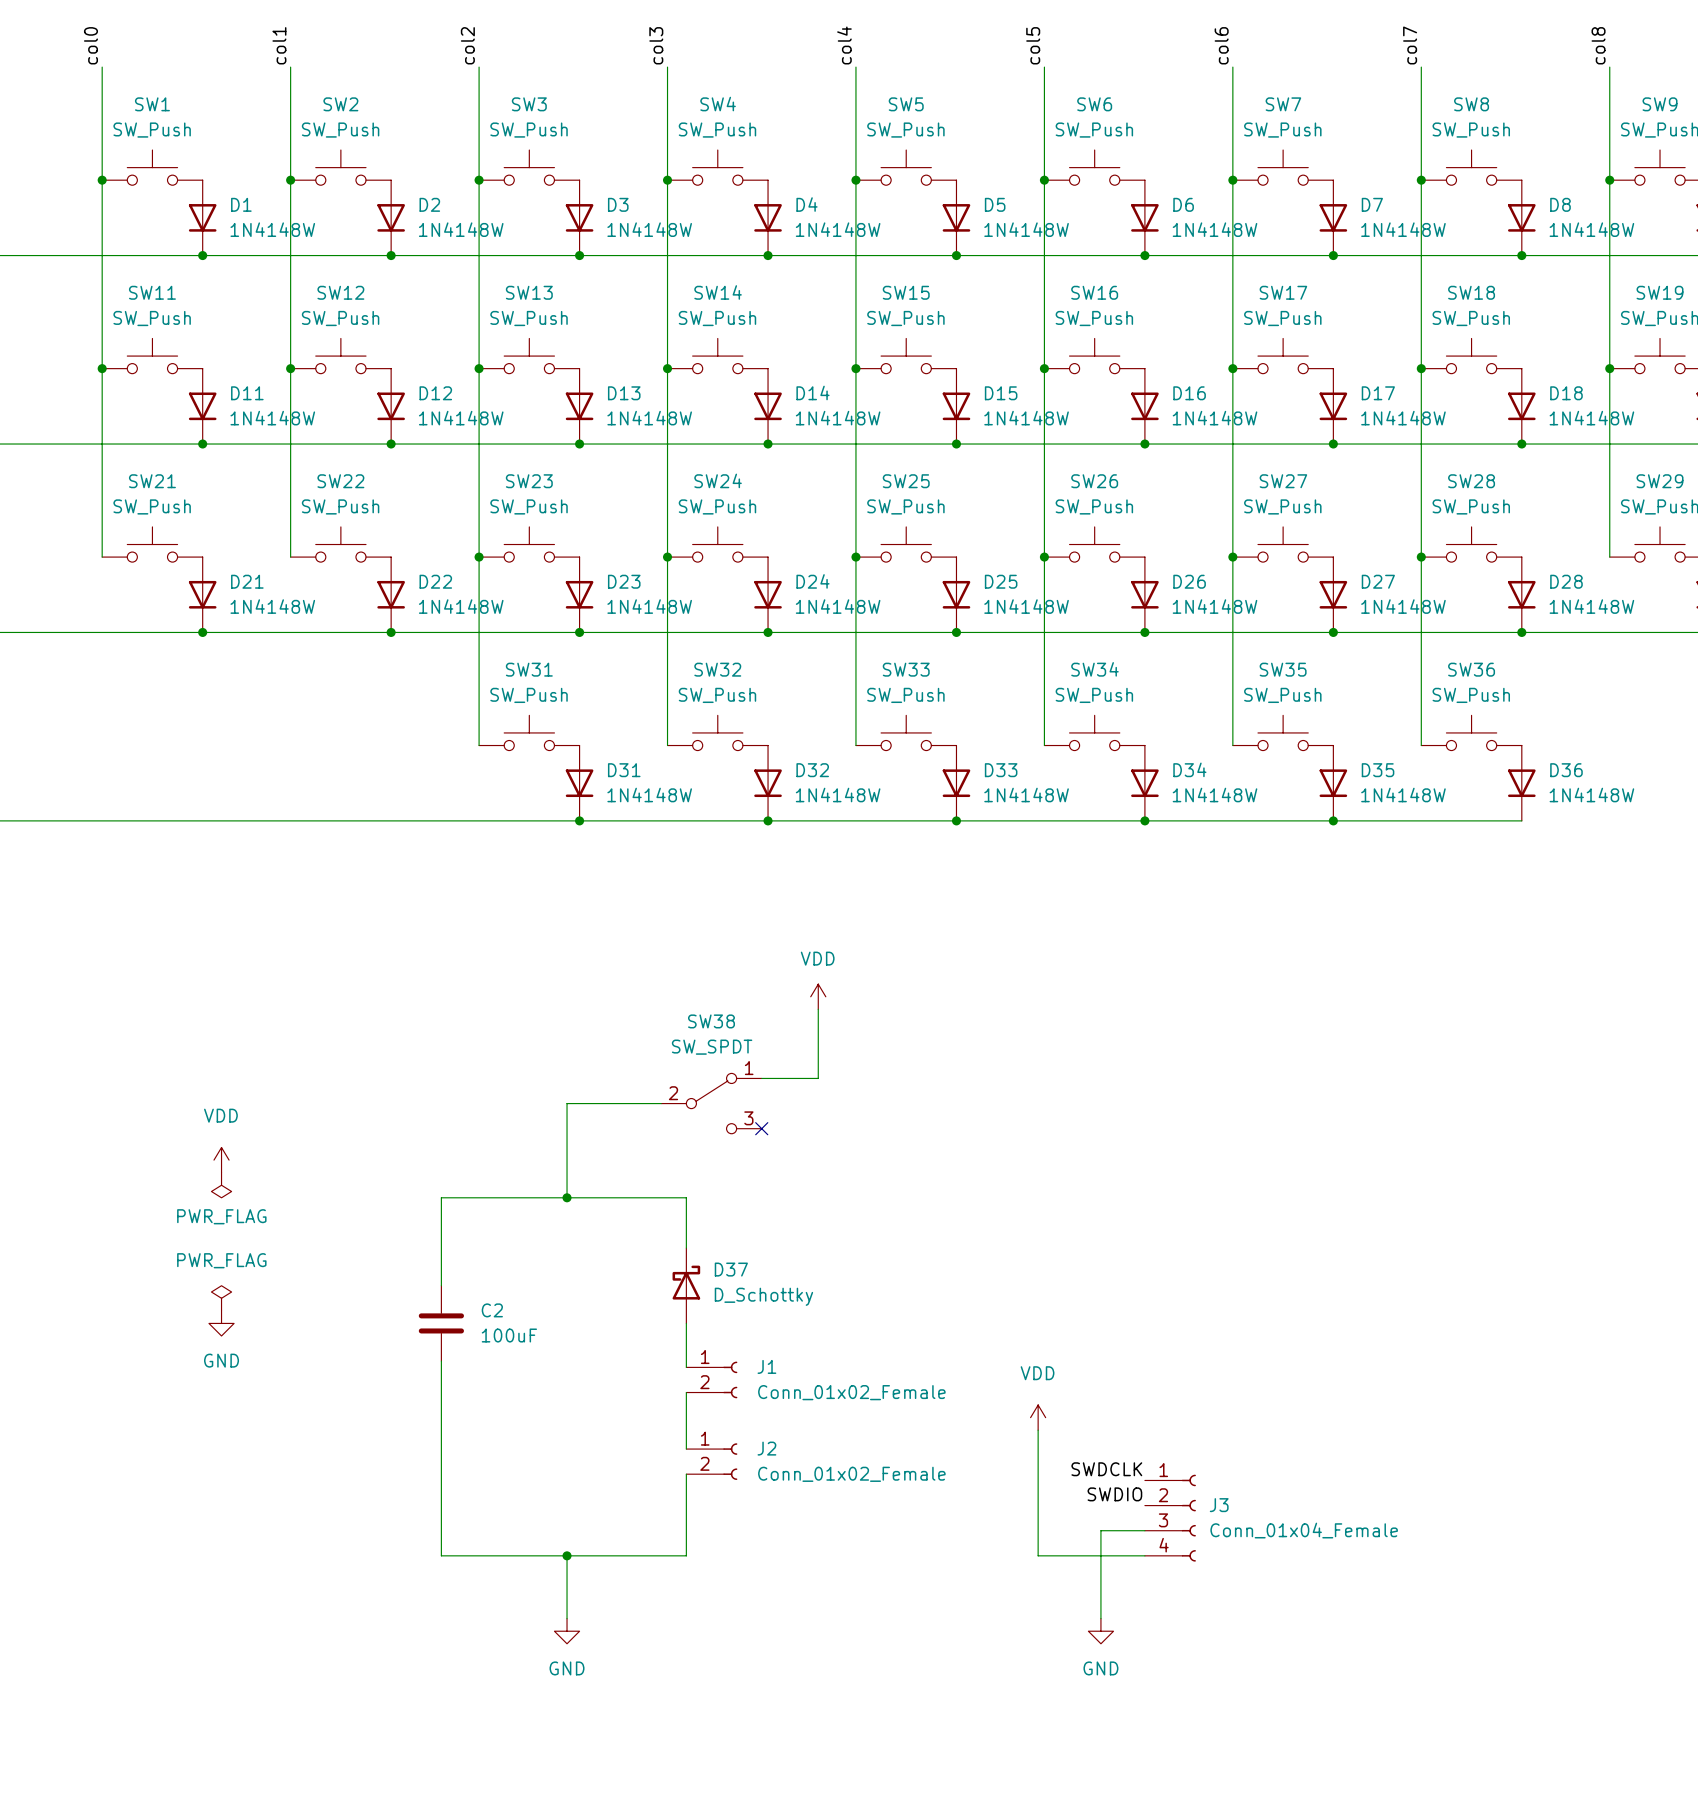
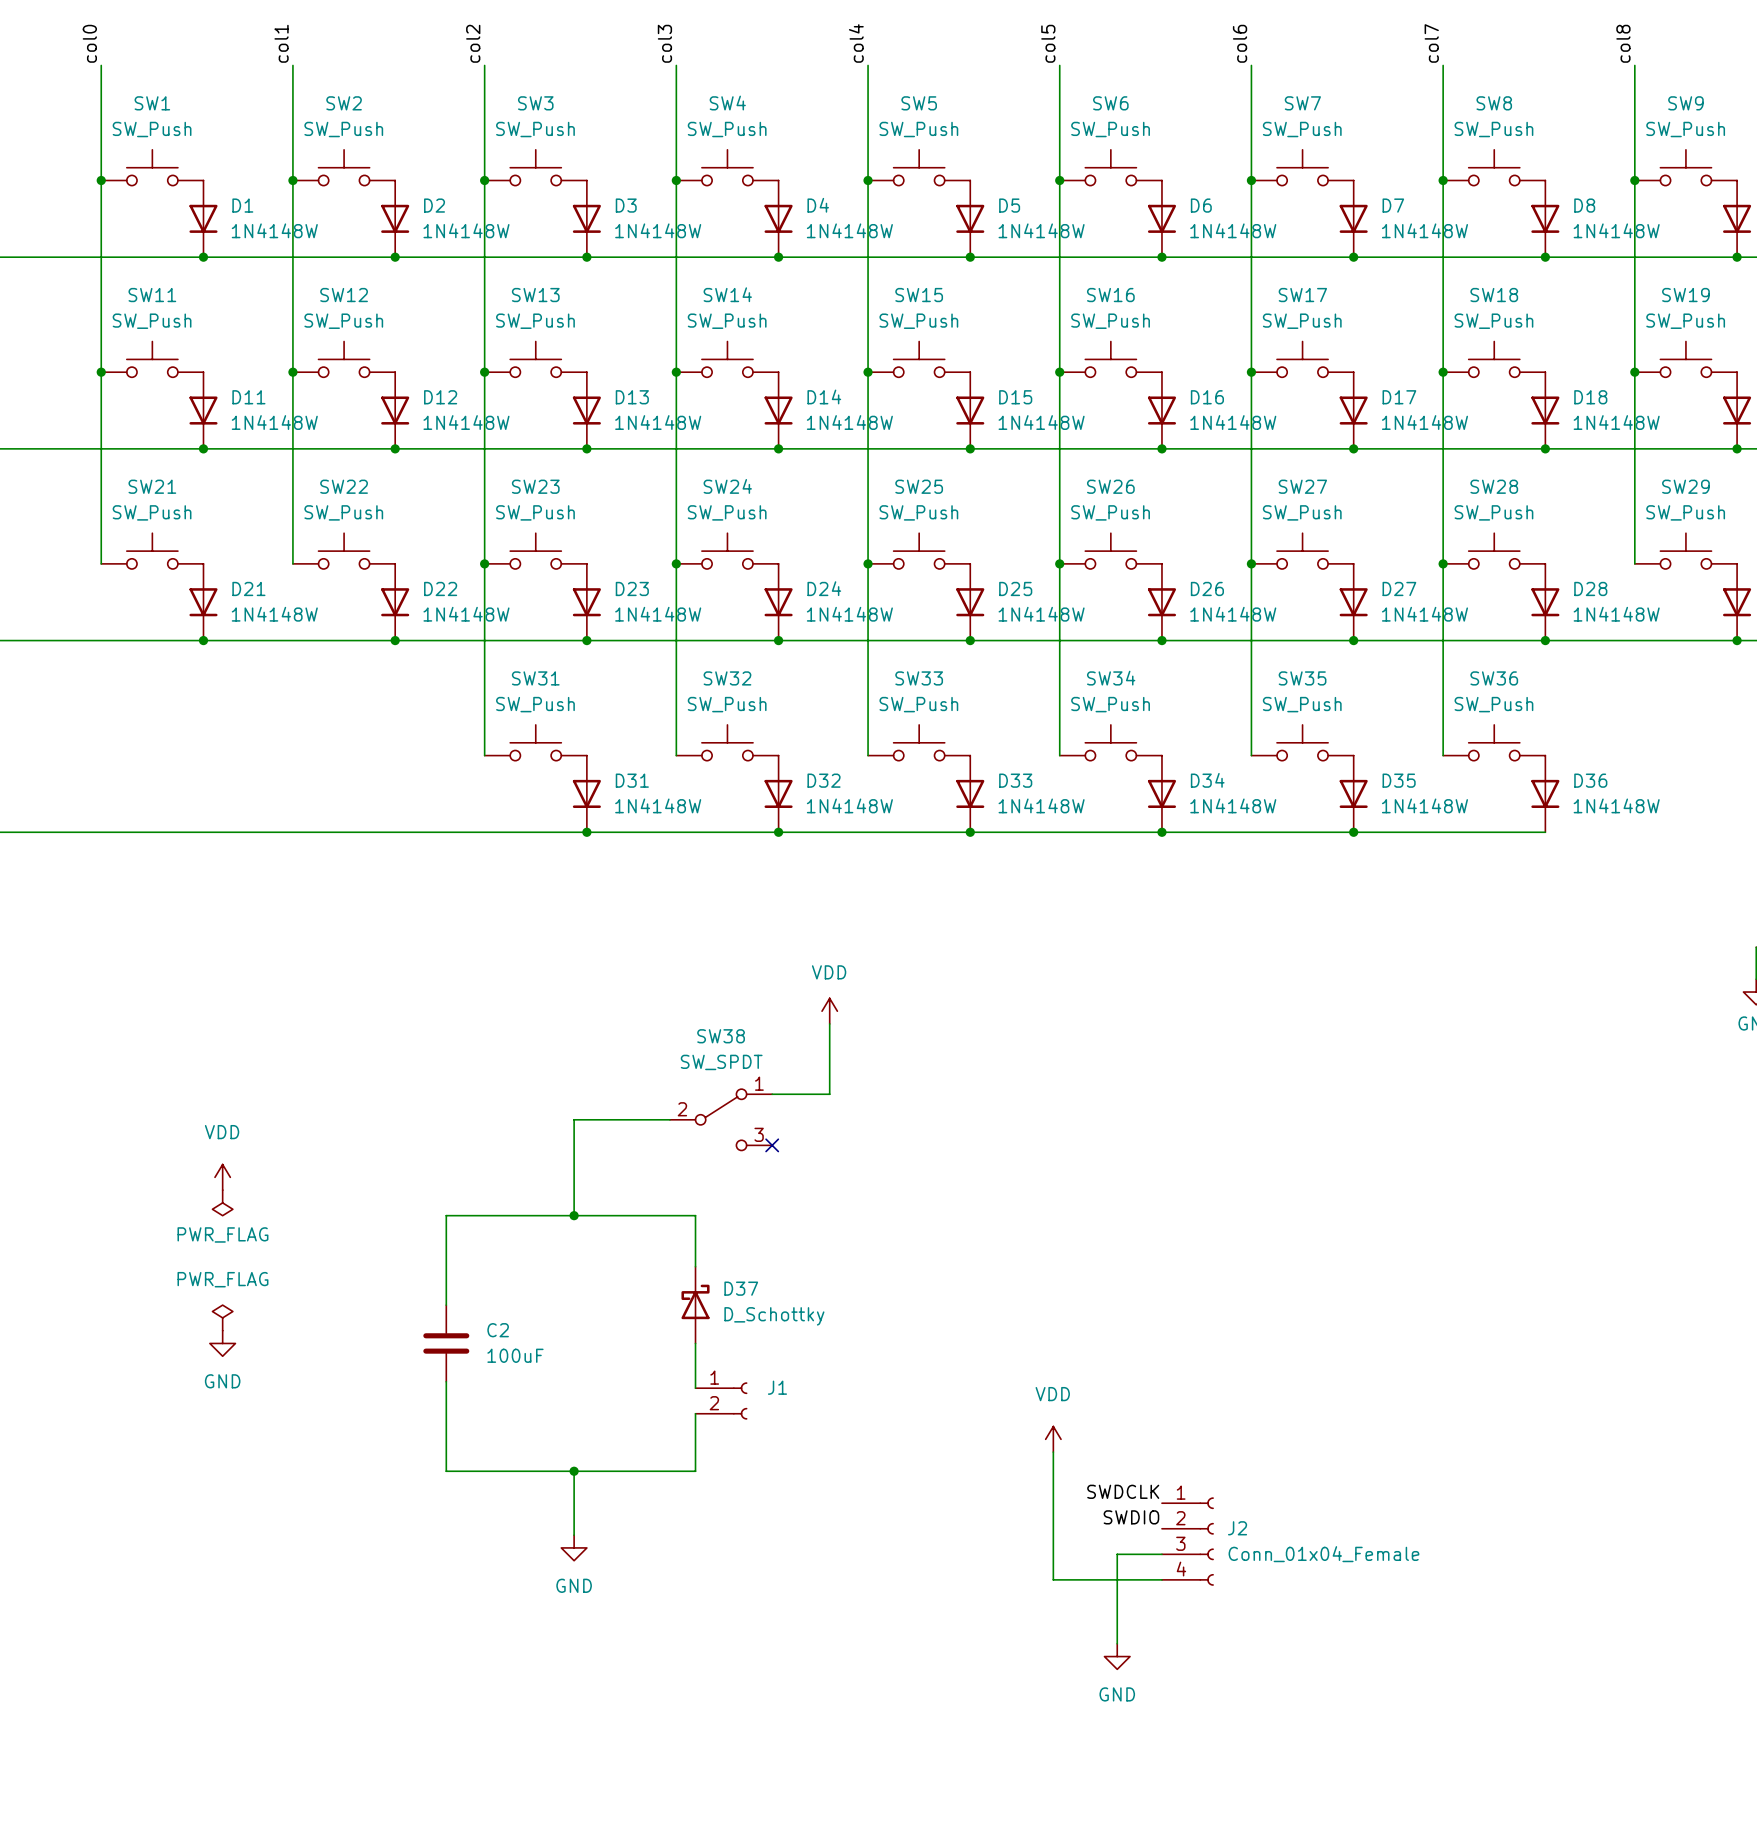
J1 value: Conn_01x02_Female (851, 1392) -> none
wire: (441, 1449) (441, 1555) (686, 1555) (686, 1474) -> (446, 1471) (695, 1471)
junction: none -> (574, 1471)
J2: Conn_01x02_Female (711, 1461) -> none
J3 name: J3 (1219, 1505) -> J2 (1237, 1528)
wire: (567, 1555) (567, 1618) -> (574, 1471) (574, 1535)
junction: (567, 1555) -> none
power symbol position: GND (567, 1631) -> GND (574, 1547)

